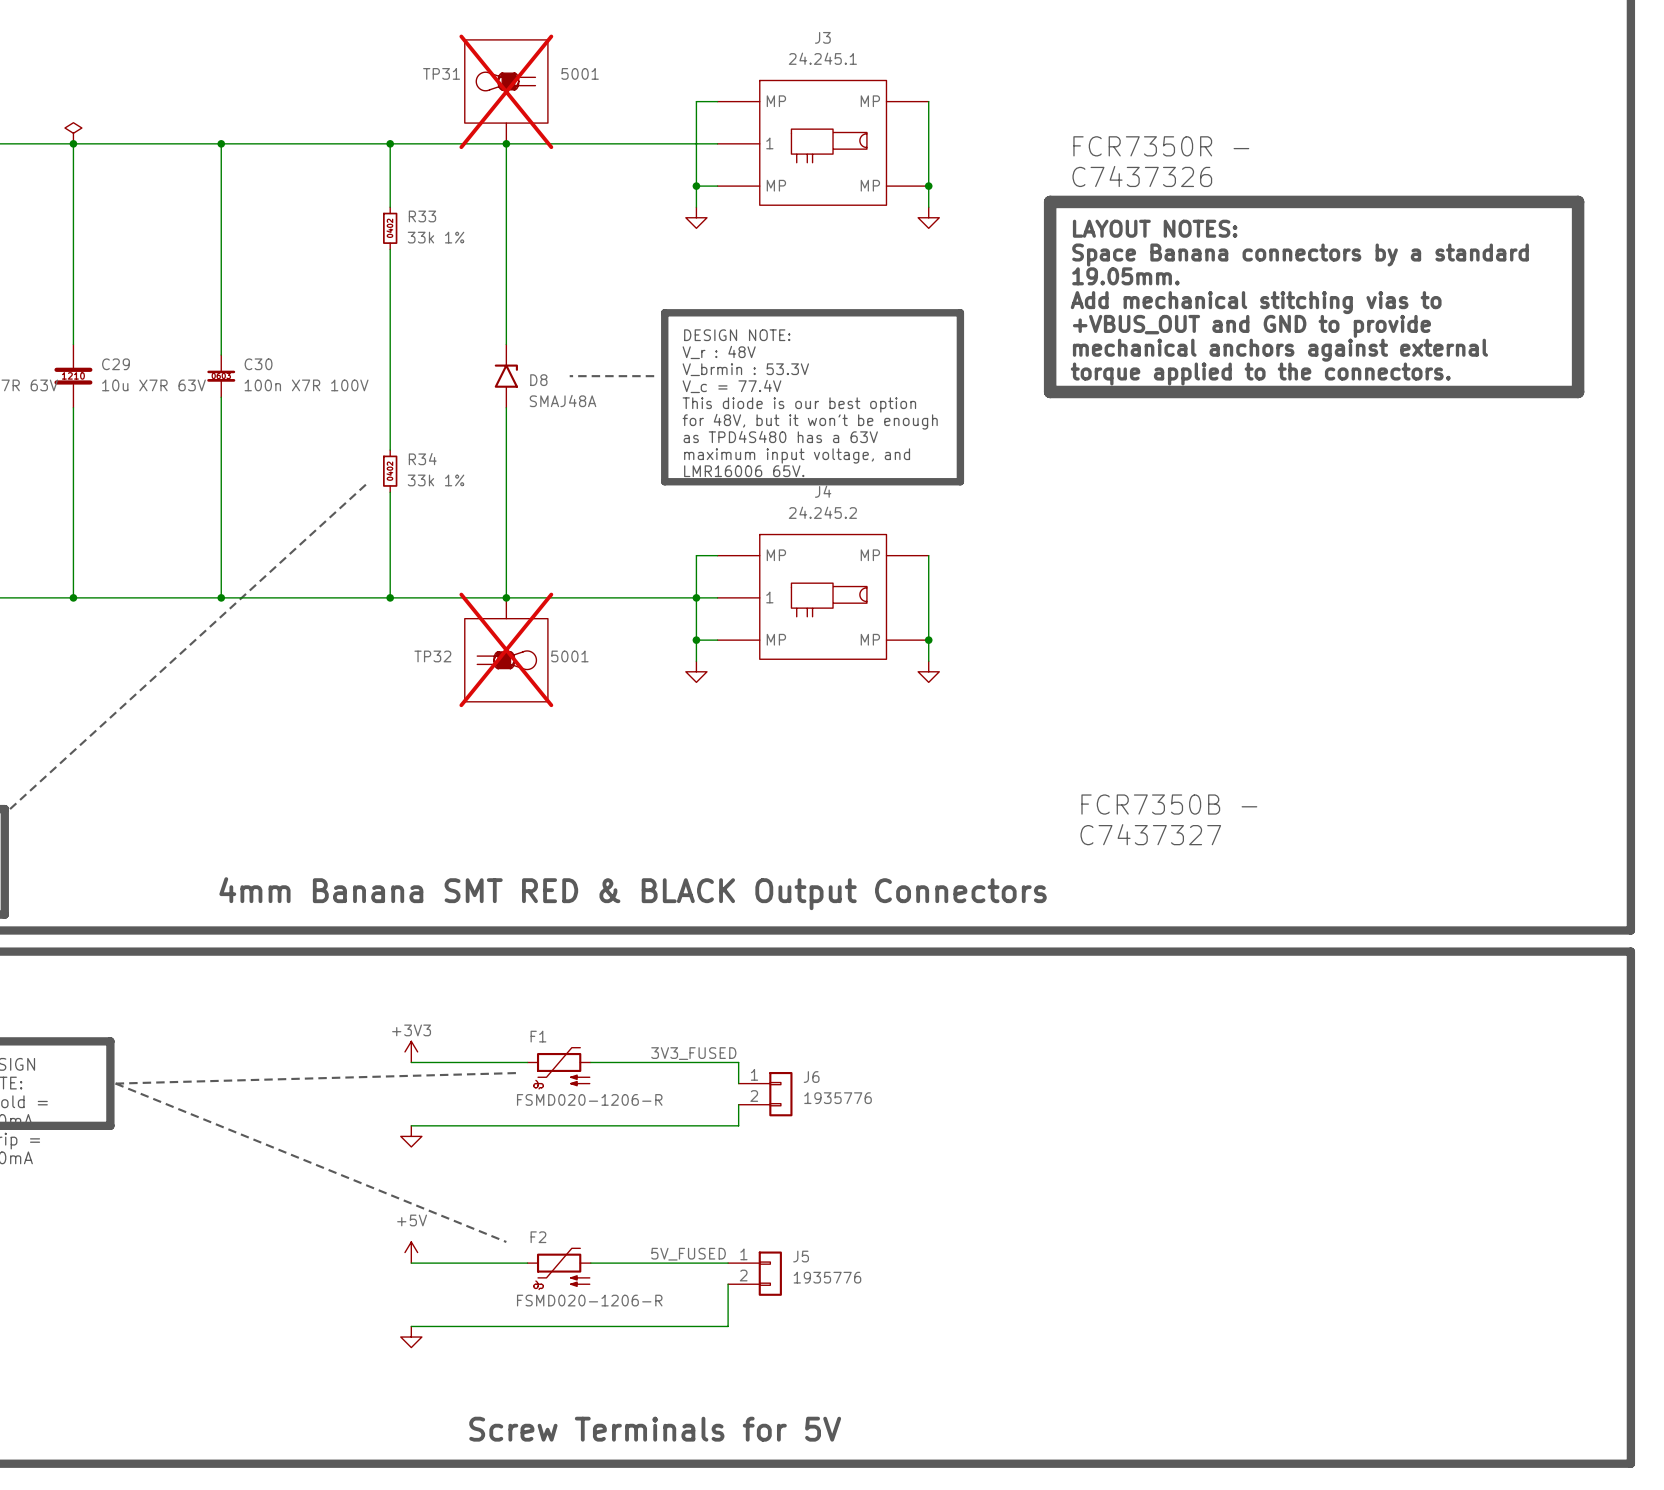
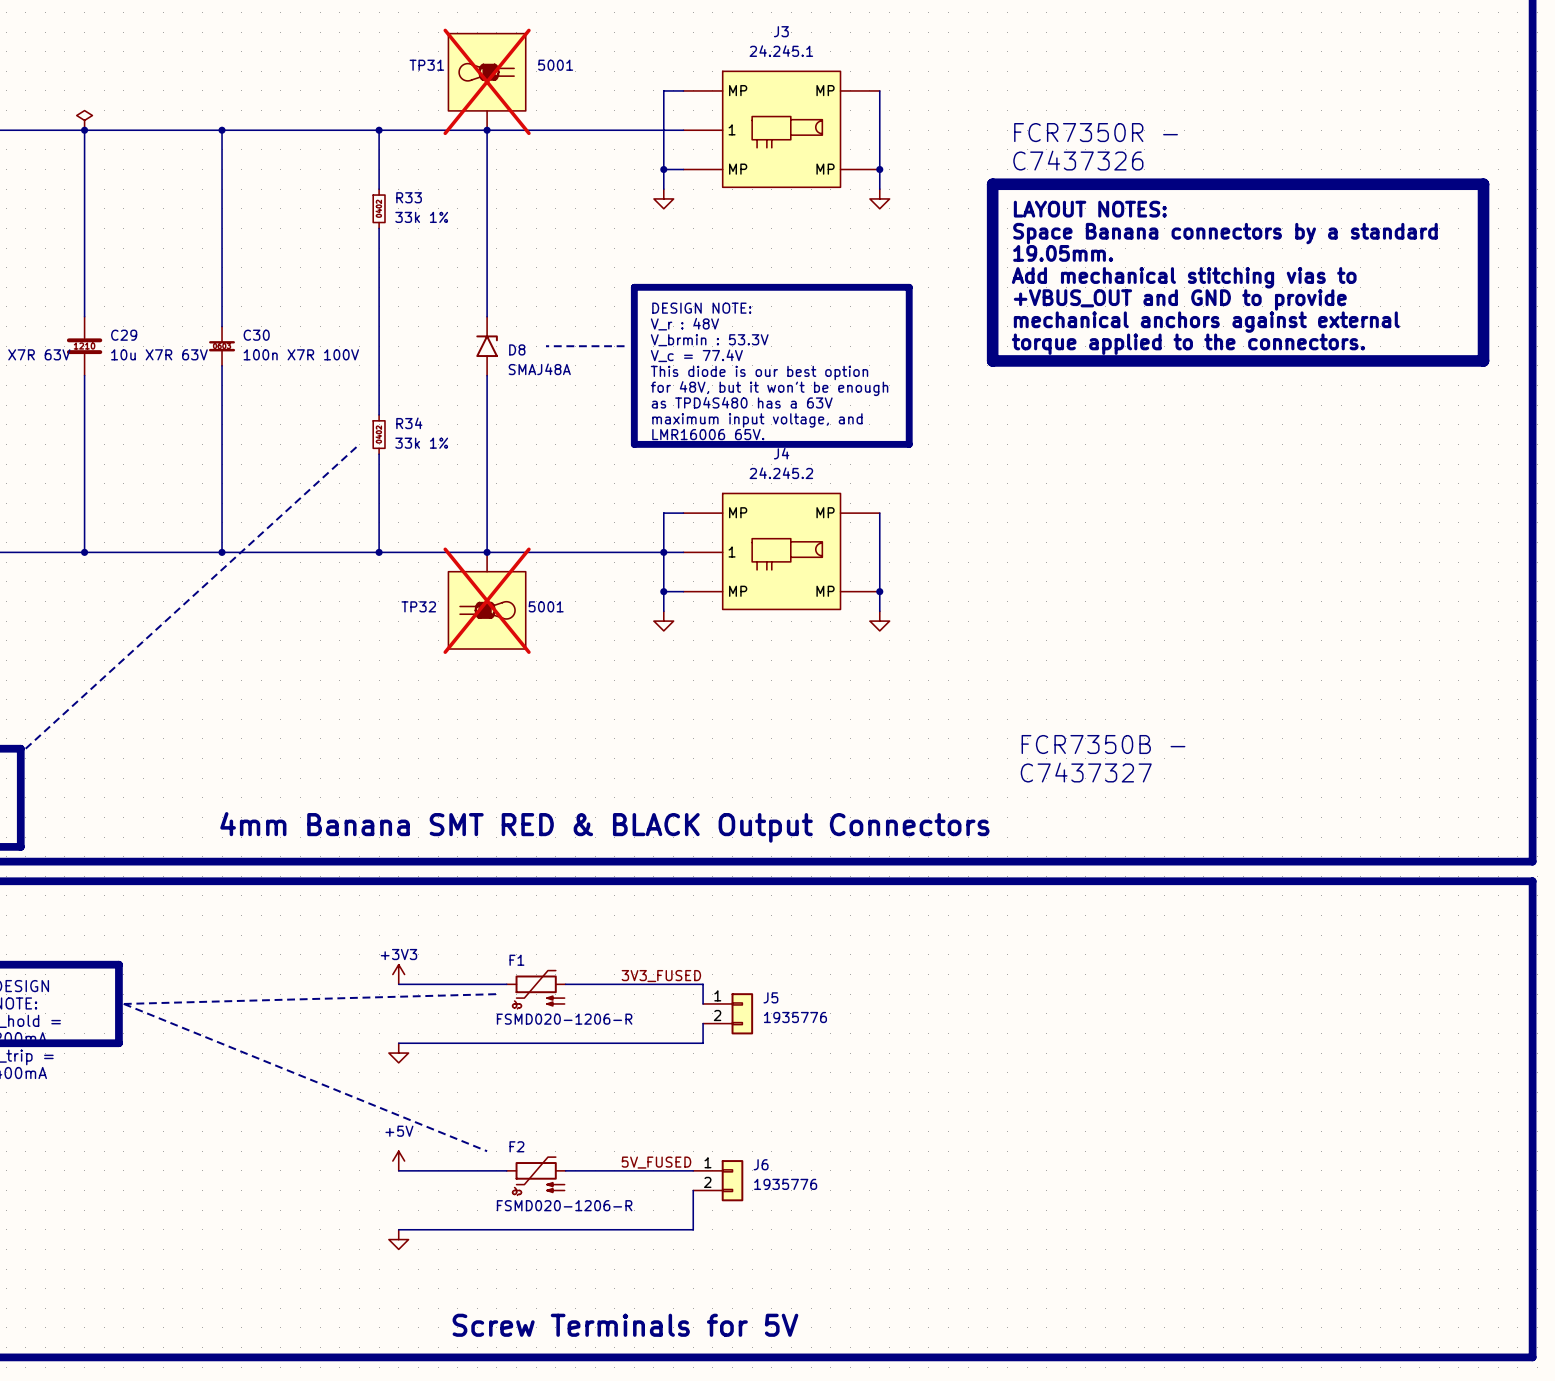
J6 name: J6 (811, 1077) -> J5 (770, 997)
J5 name: J5 (801, 1256) -> J6 (761, 1164)

